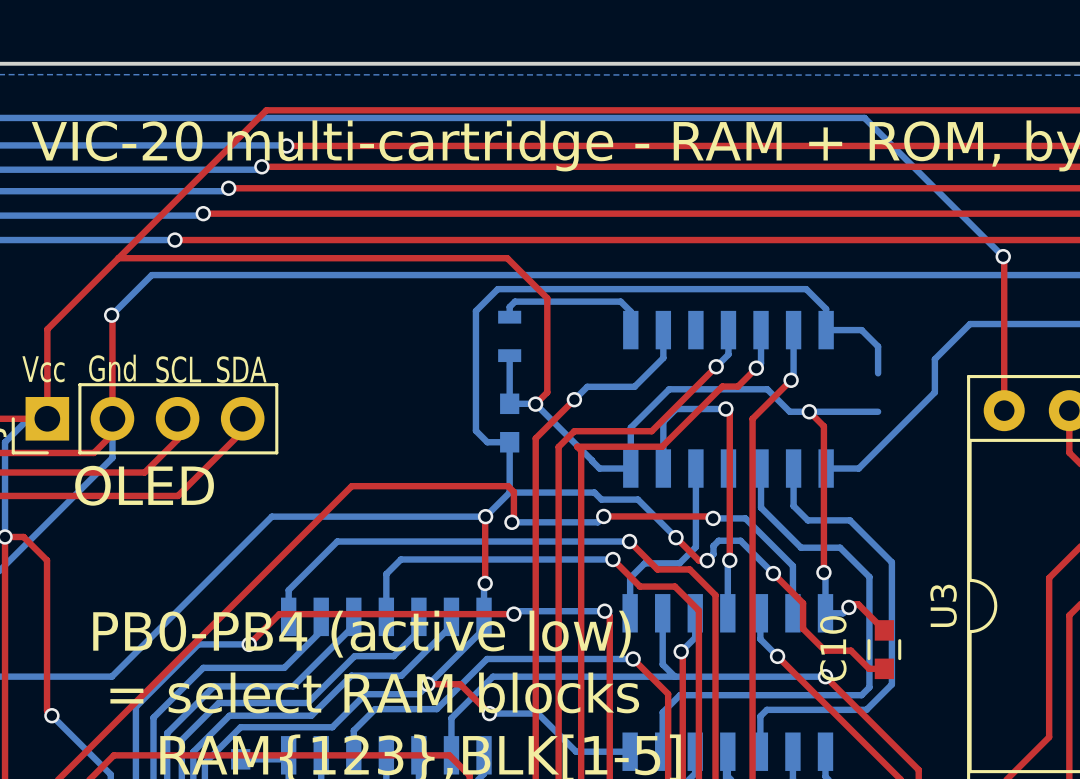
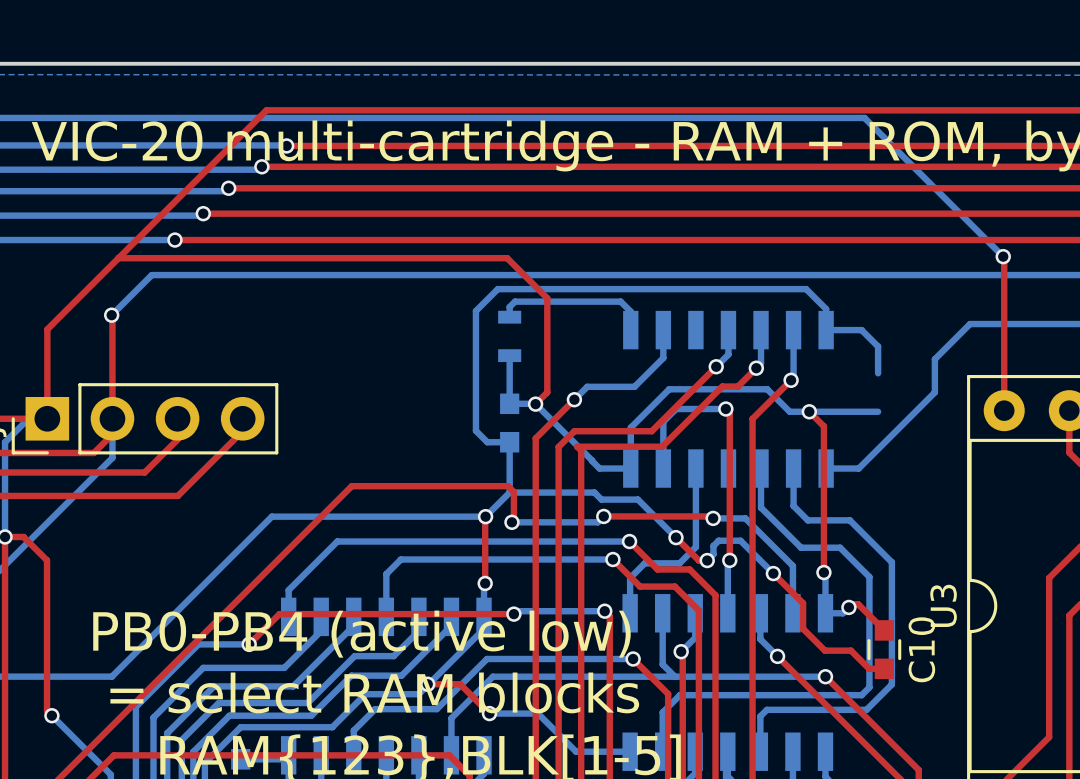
text: Gnd (112, 368) -> none
text: Vcc (43, 369) -> none
text: SCL (178, 369) -> none
text: SDA (241, 369) -> none
text: OLED (144, 485) -> none
C10 name position: C10 (833, 648) -> C10 (921, 649)

